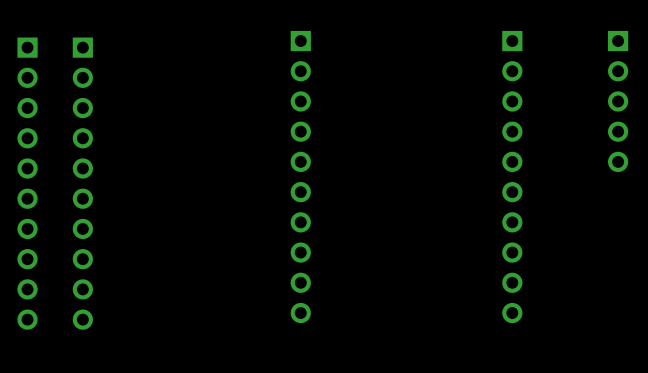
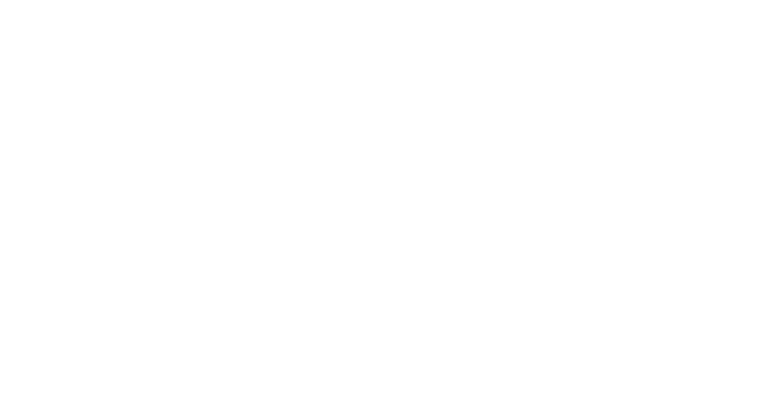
part: (618, 101) -> none
part: (300, 177) -> none
part: (512, 177) -> none
part: (27, 183) -> none
part: (82, 183) -> none

